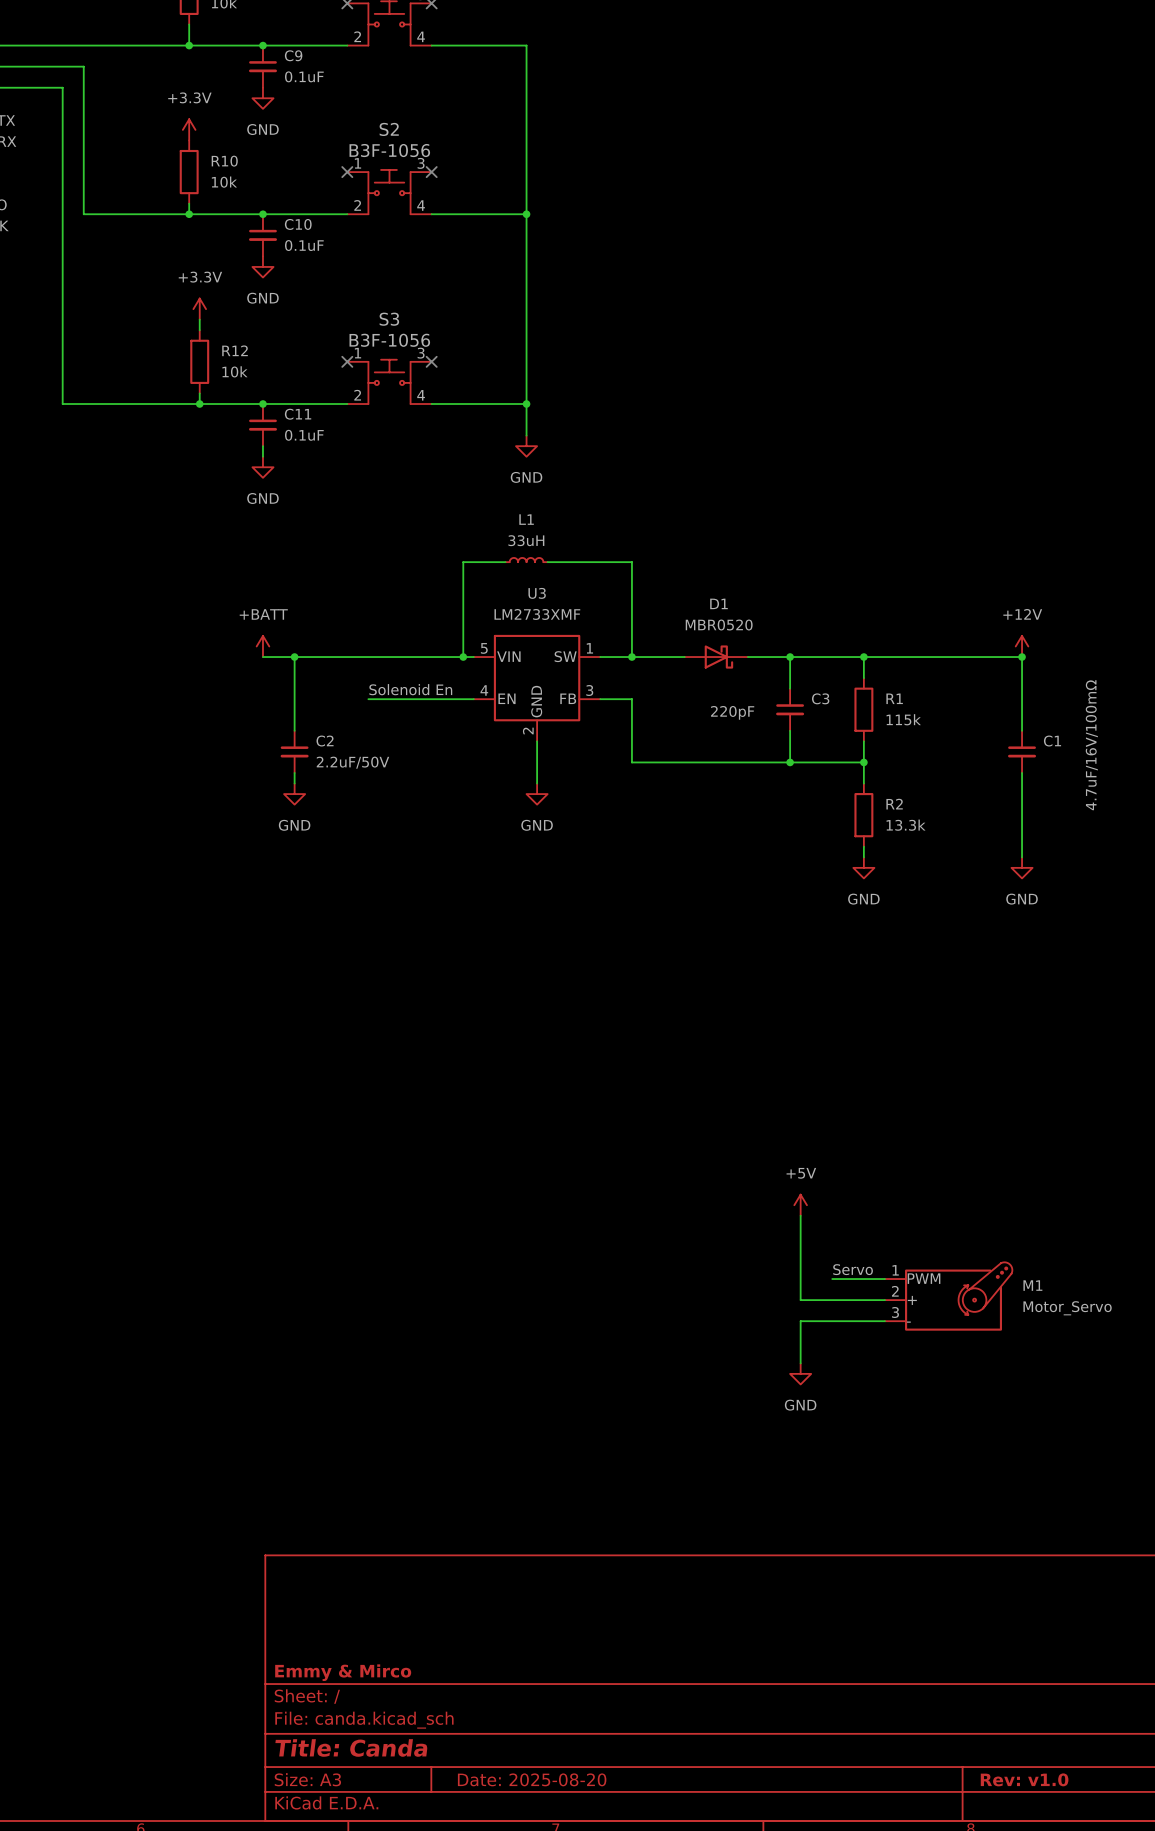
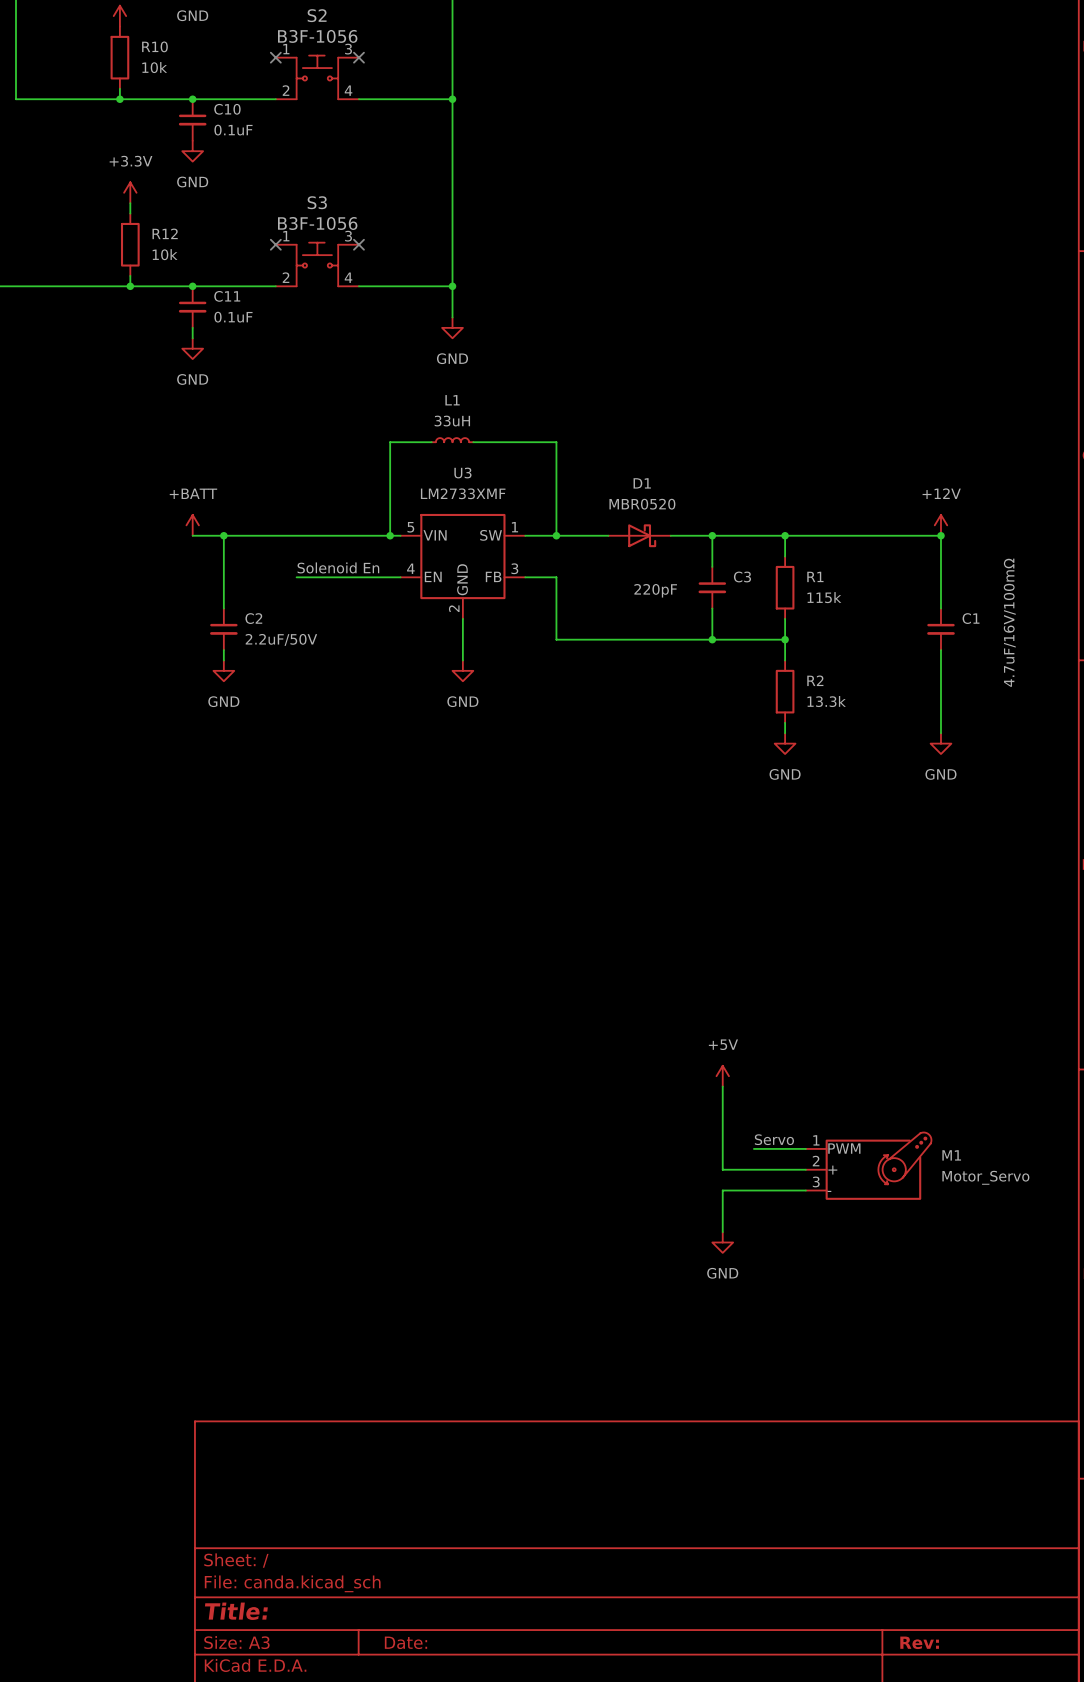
title block: Emmy & Mirco (343, 1672) -> none
title block: Title: Canda (351, 1747) -> Title: (236, 1611)
title block: Date: 2025-08-20 (532, 1779) -> Date: (405, 1642)
title block: Rev: v1.0 (1024, 1779) -> Rev: (919, 1642)

